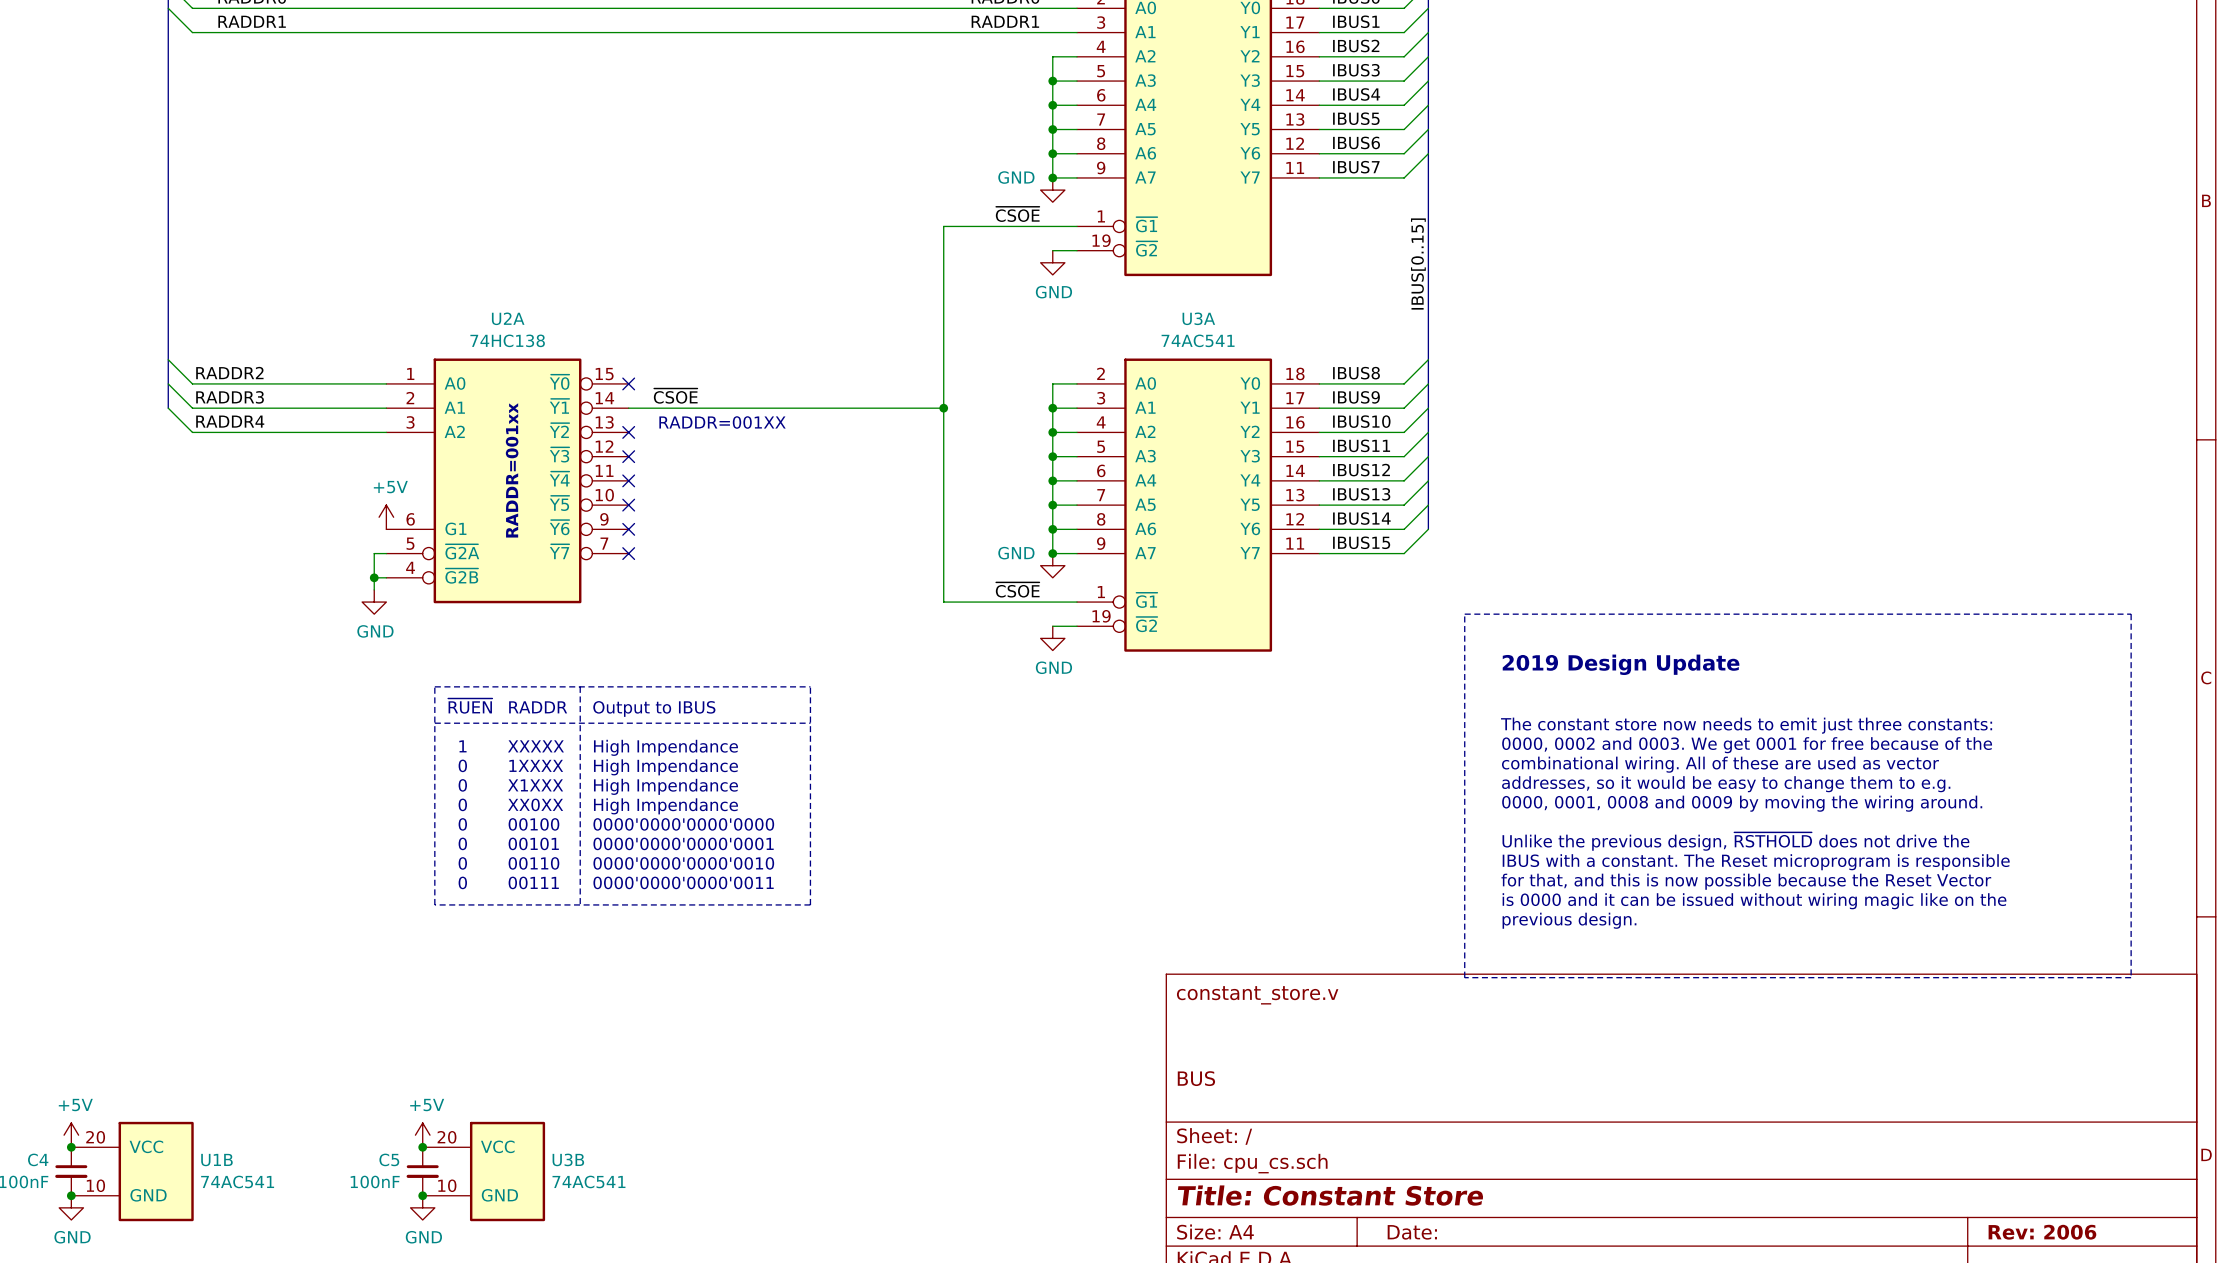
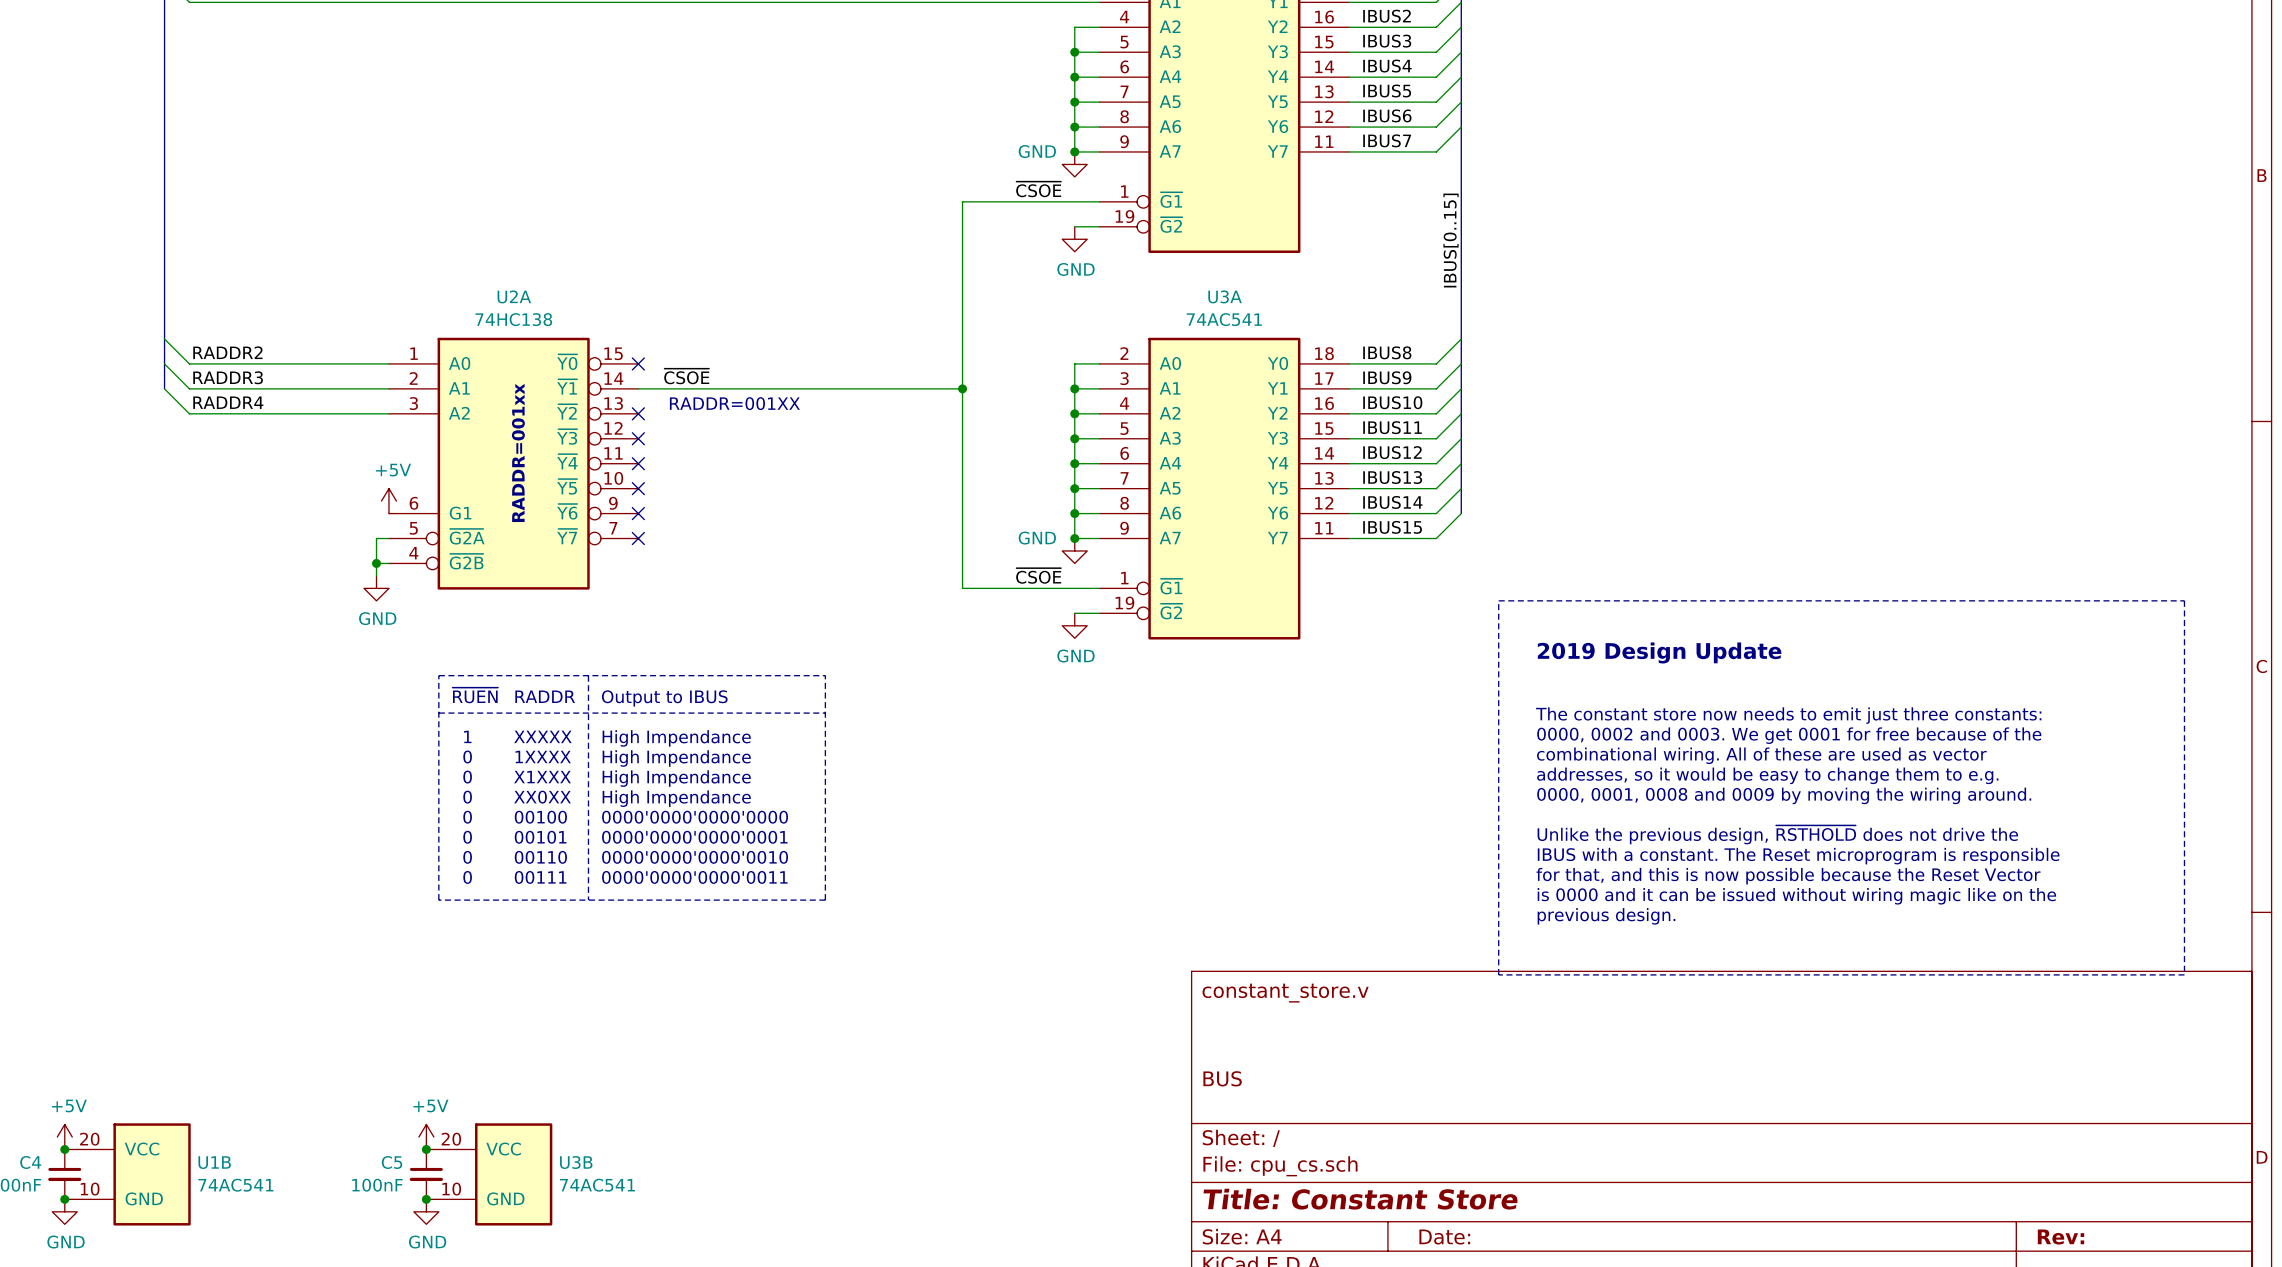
title block: Rev: 2006 (2042, 1232) -> Rev: (2061, 1237)

